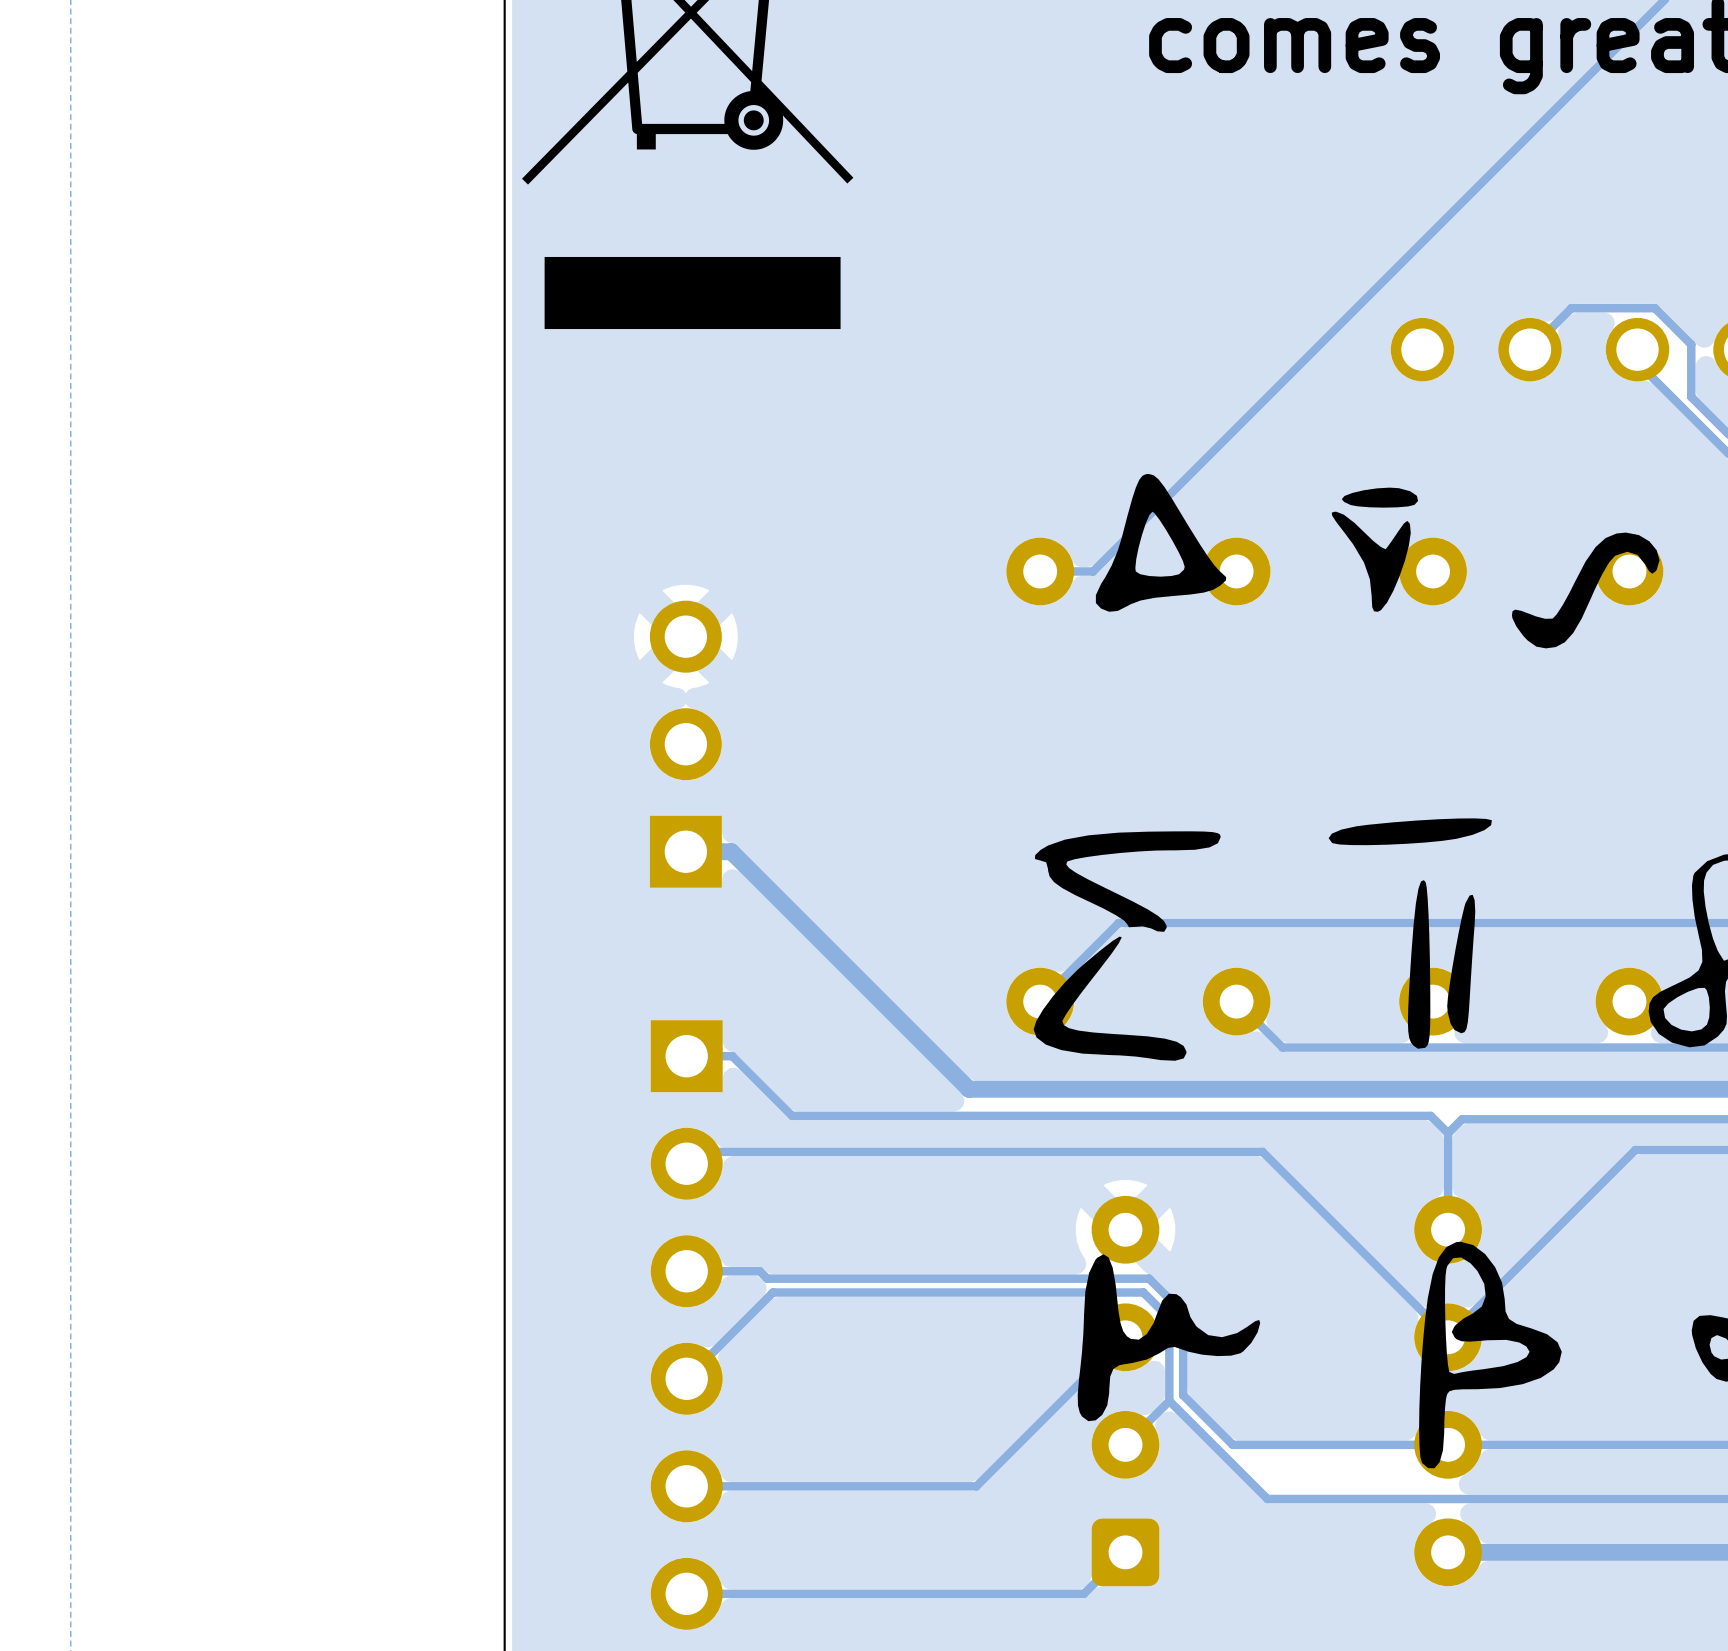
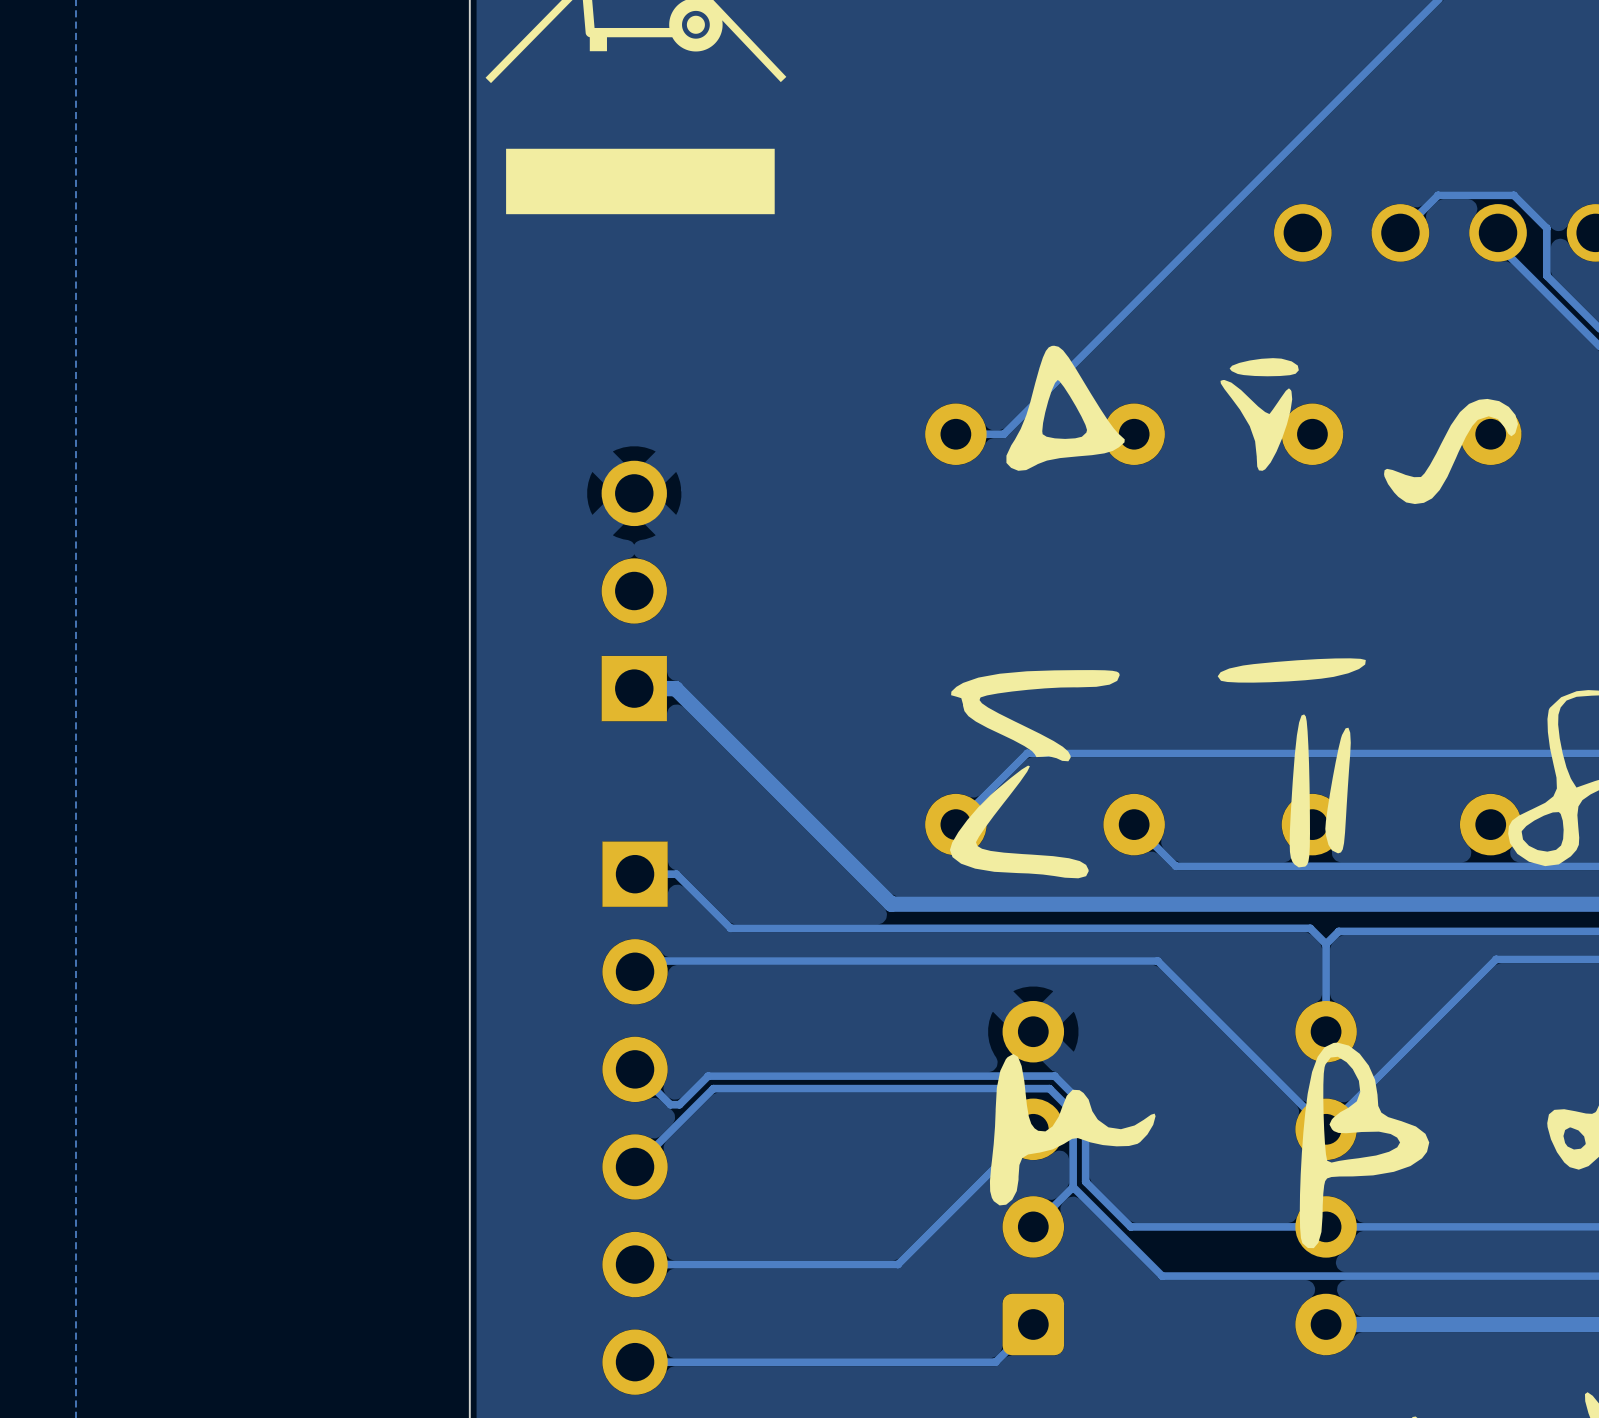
track: (686, 1271) (759, 1271) (767, 1278) -> (641, 1076) (670, 1104) (679, 1104) (708, 1076)

